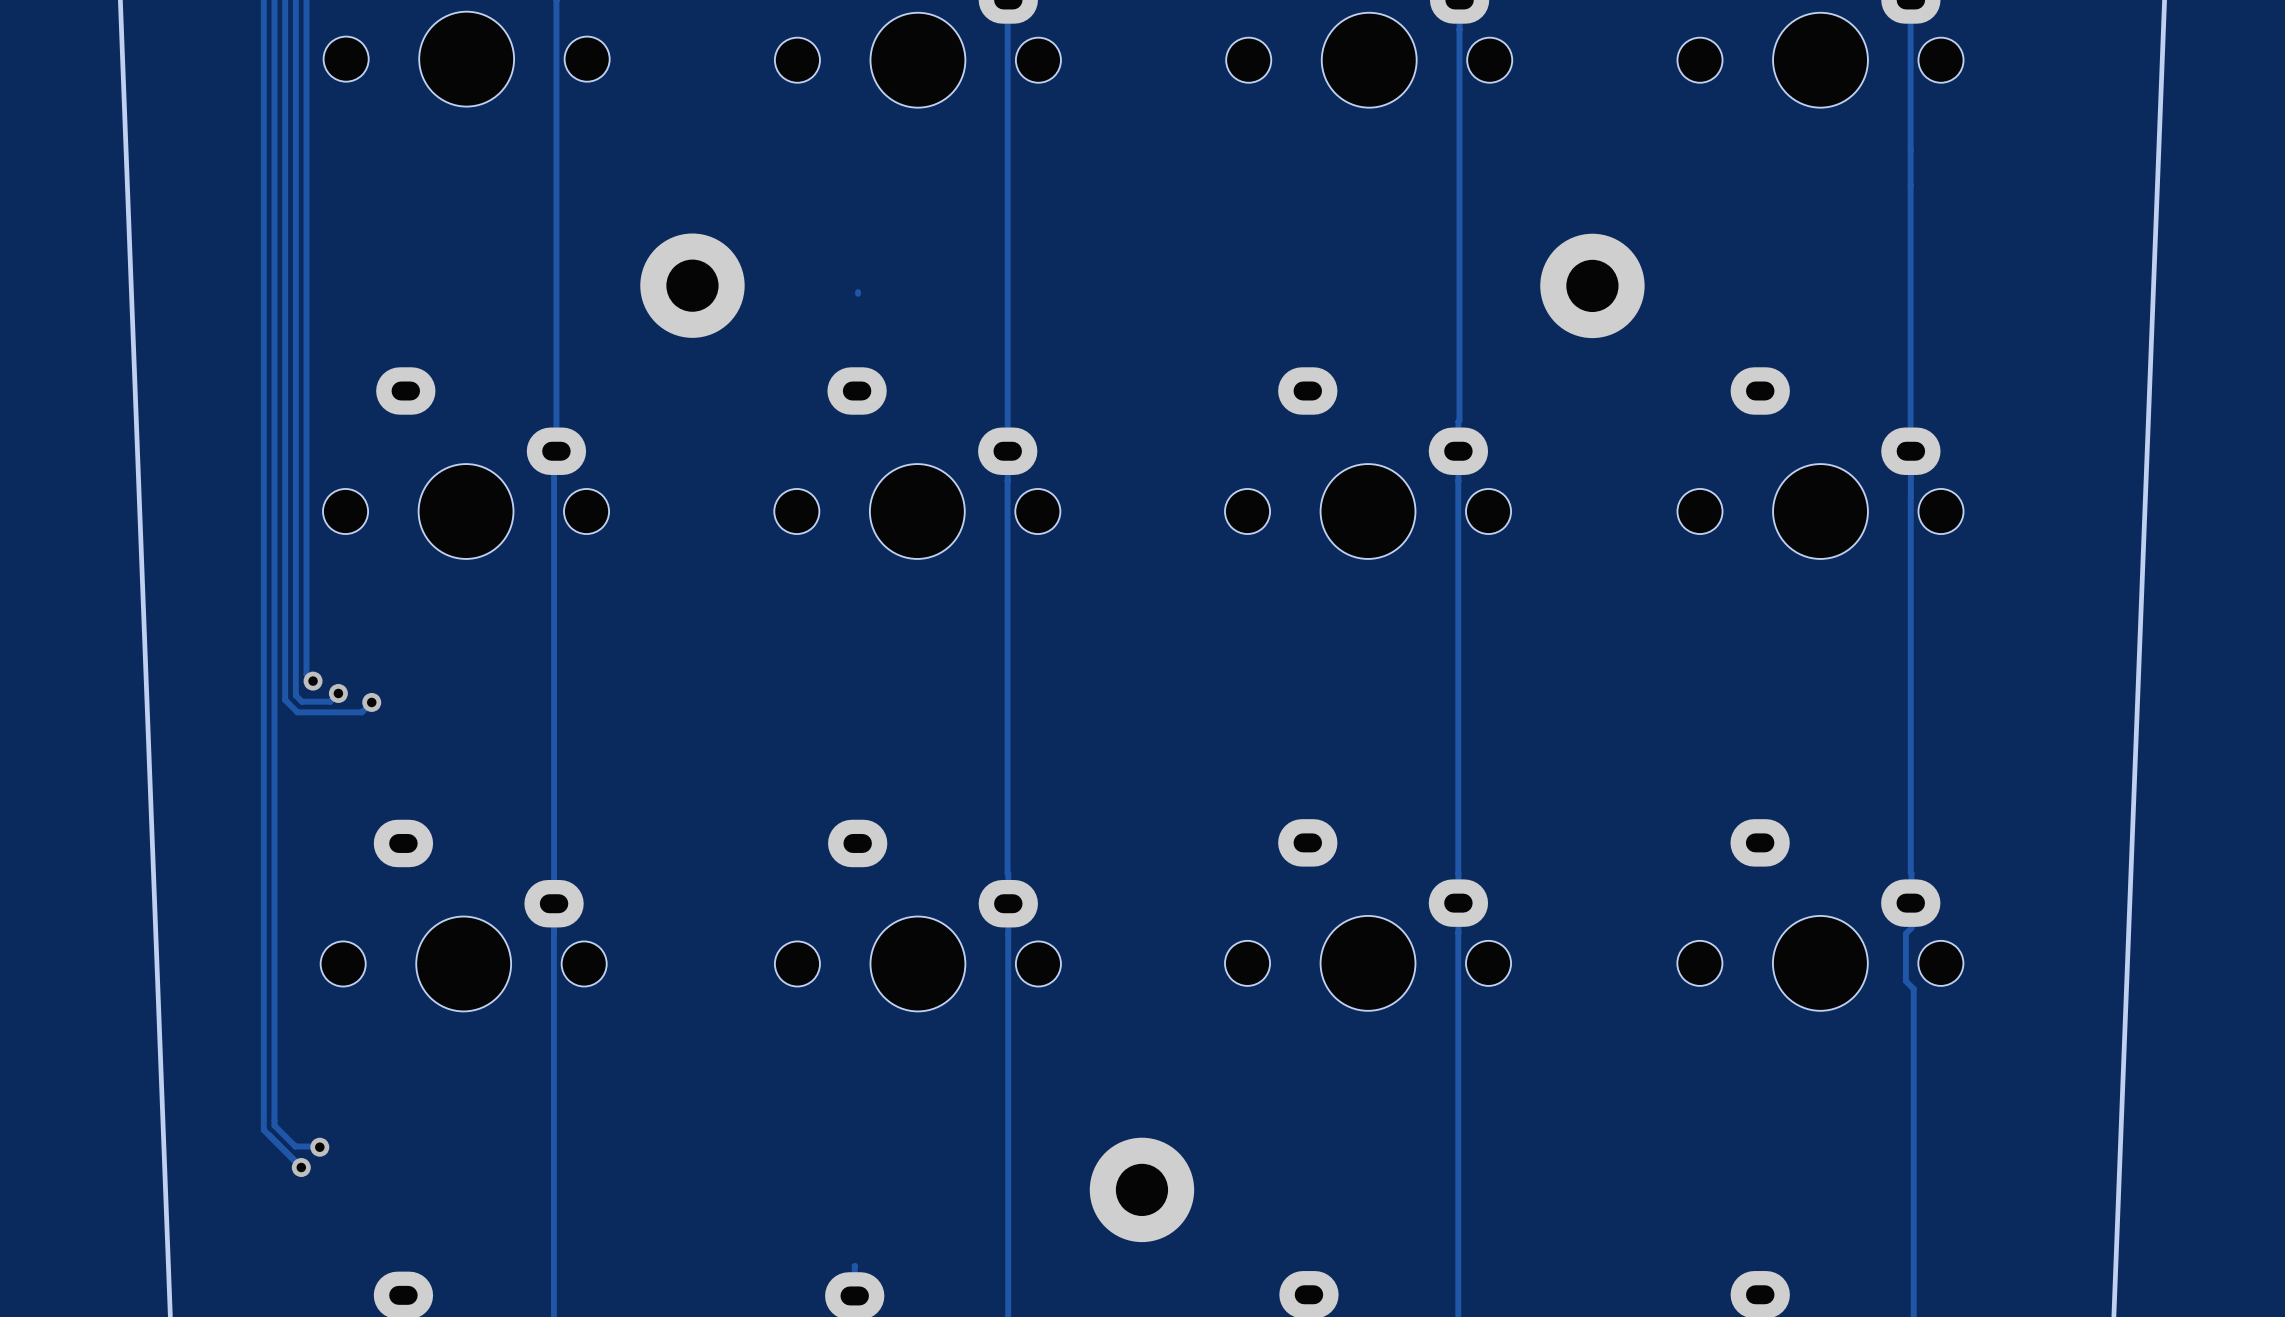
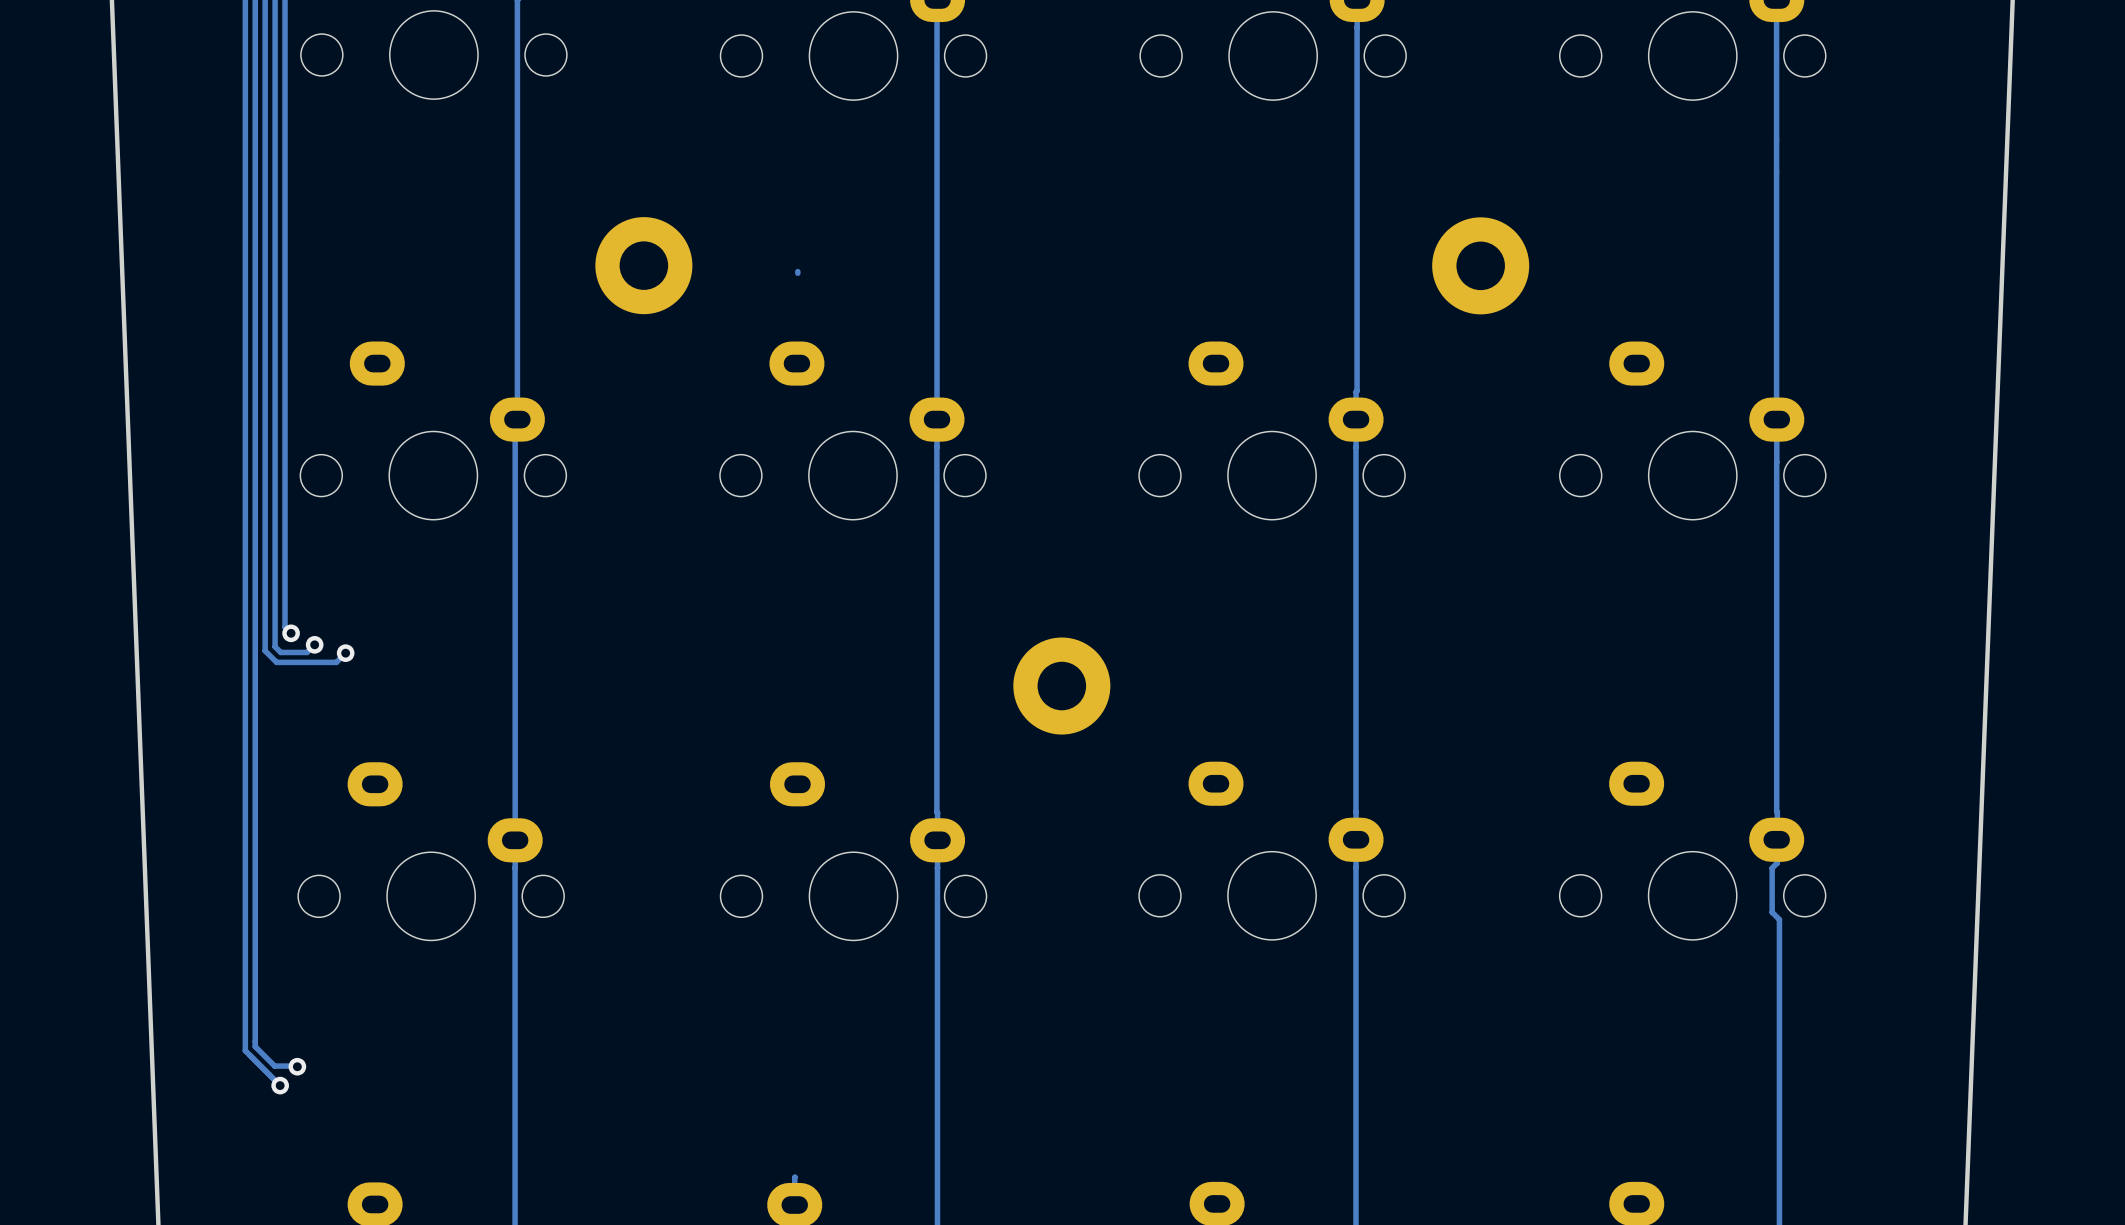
part position: (1141, 1189) -> (1061, 686)

